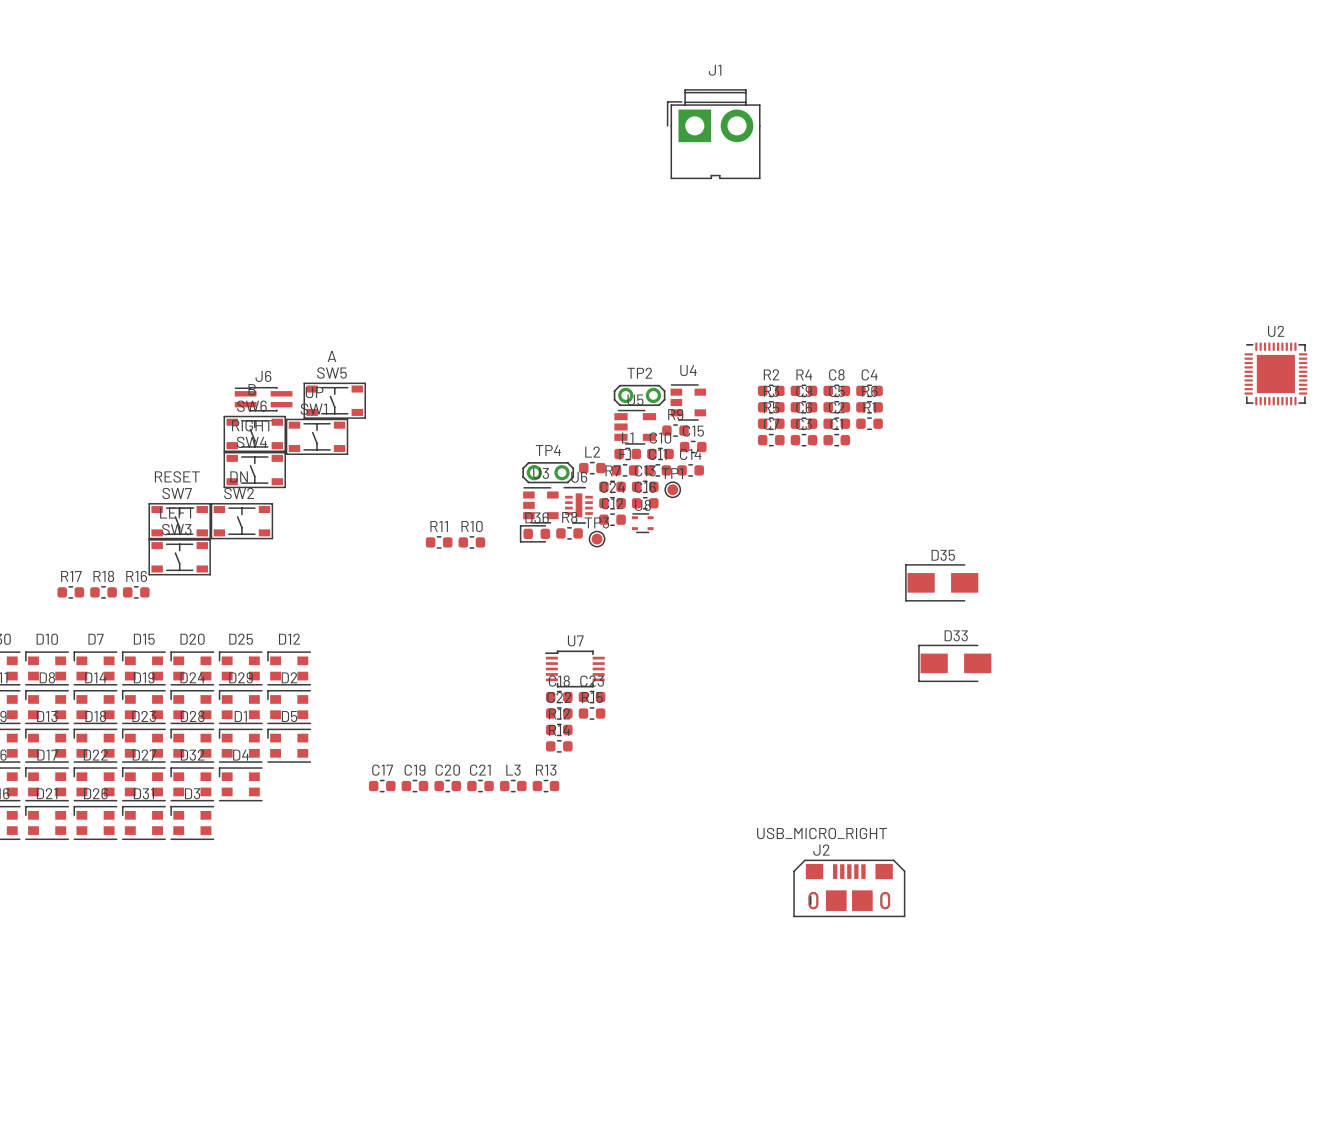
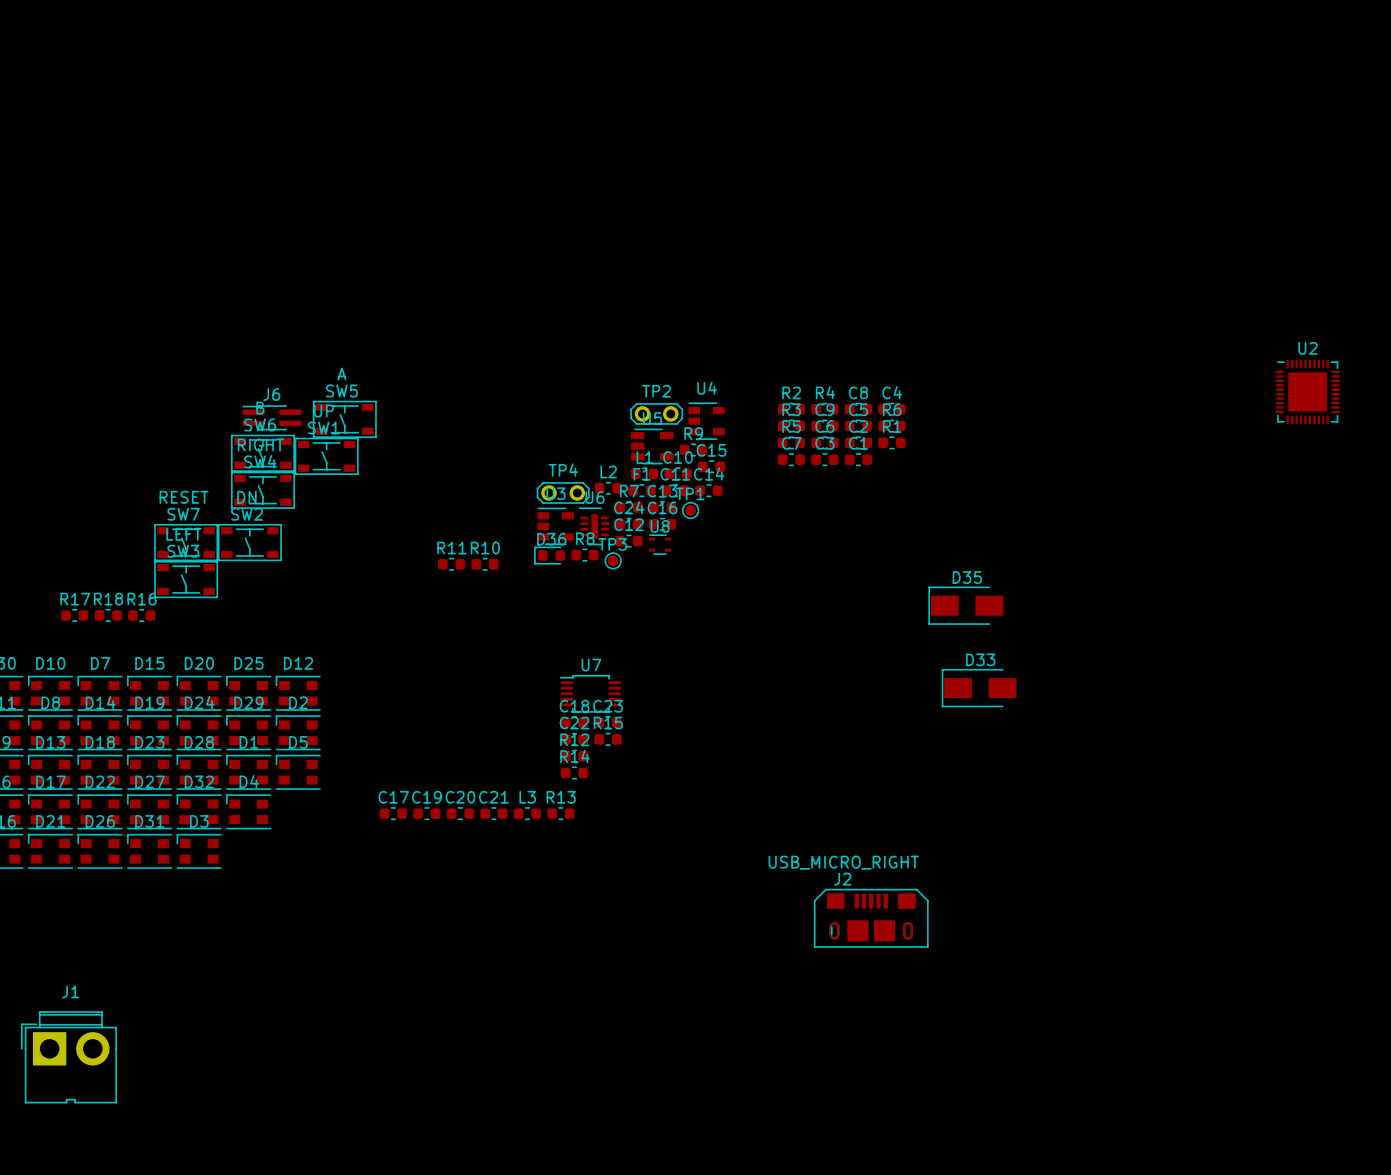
J1 position: (713, 134) -> (68, 1057)

